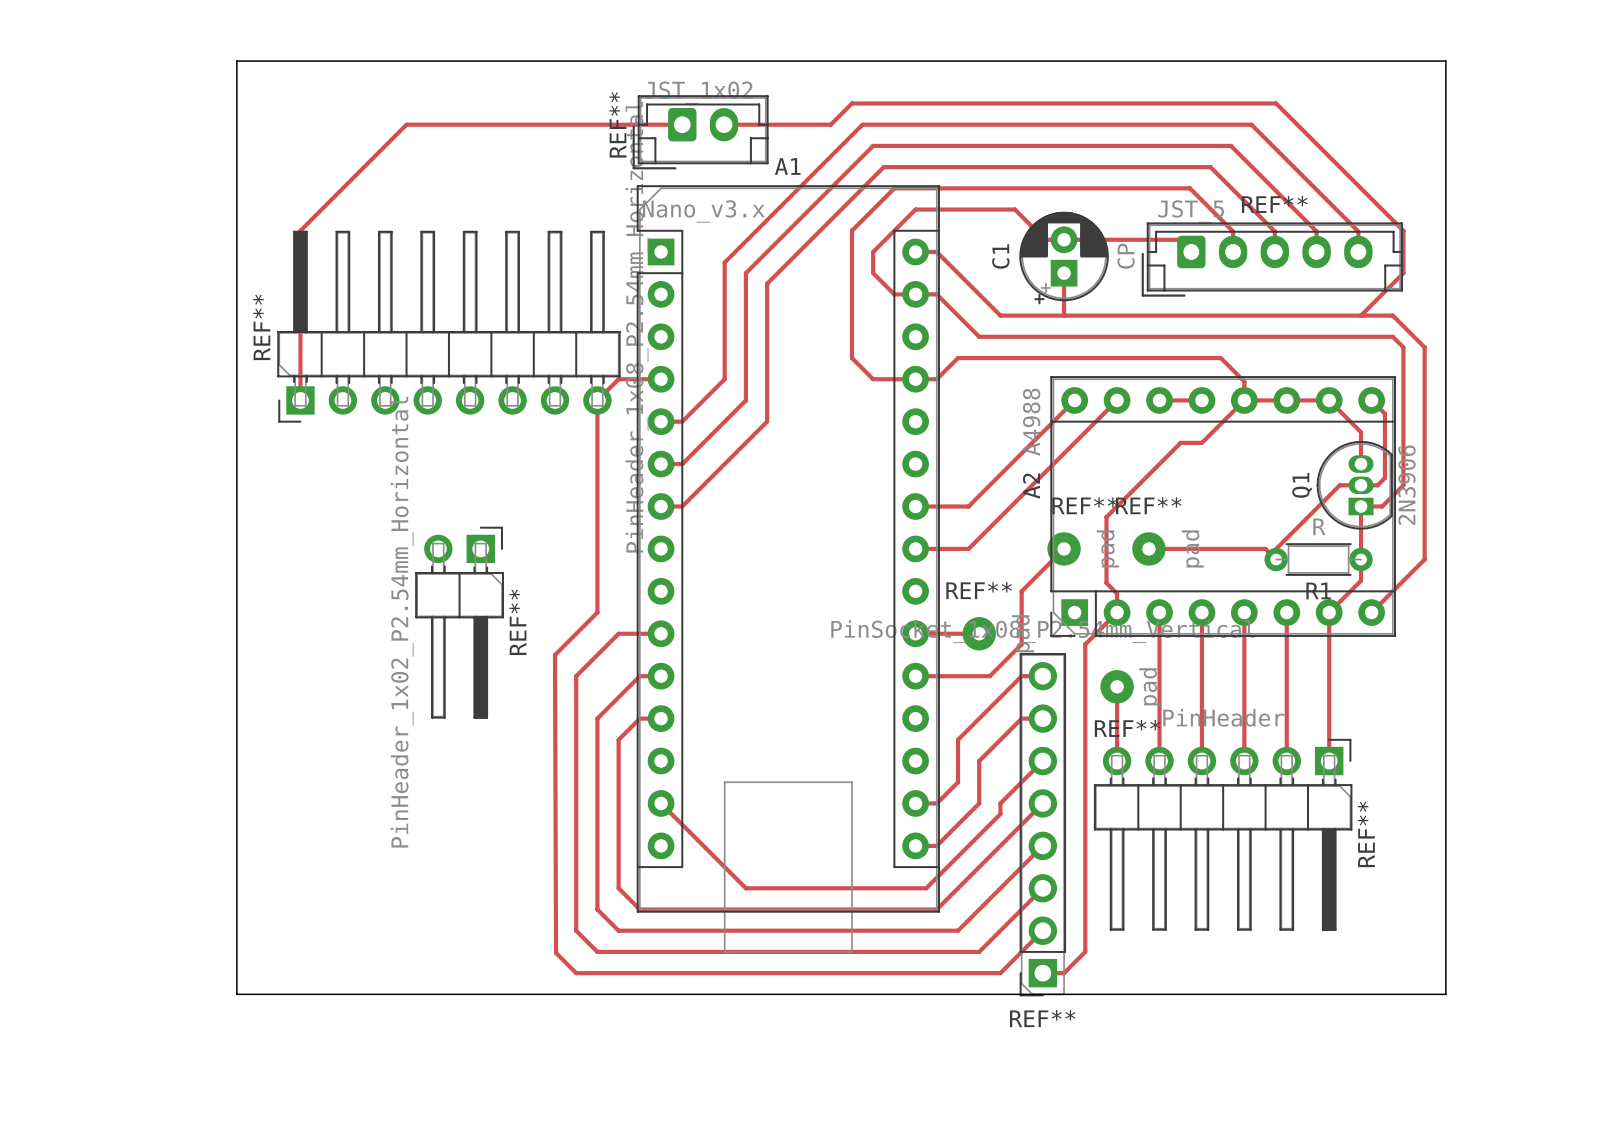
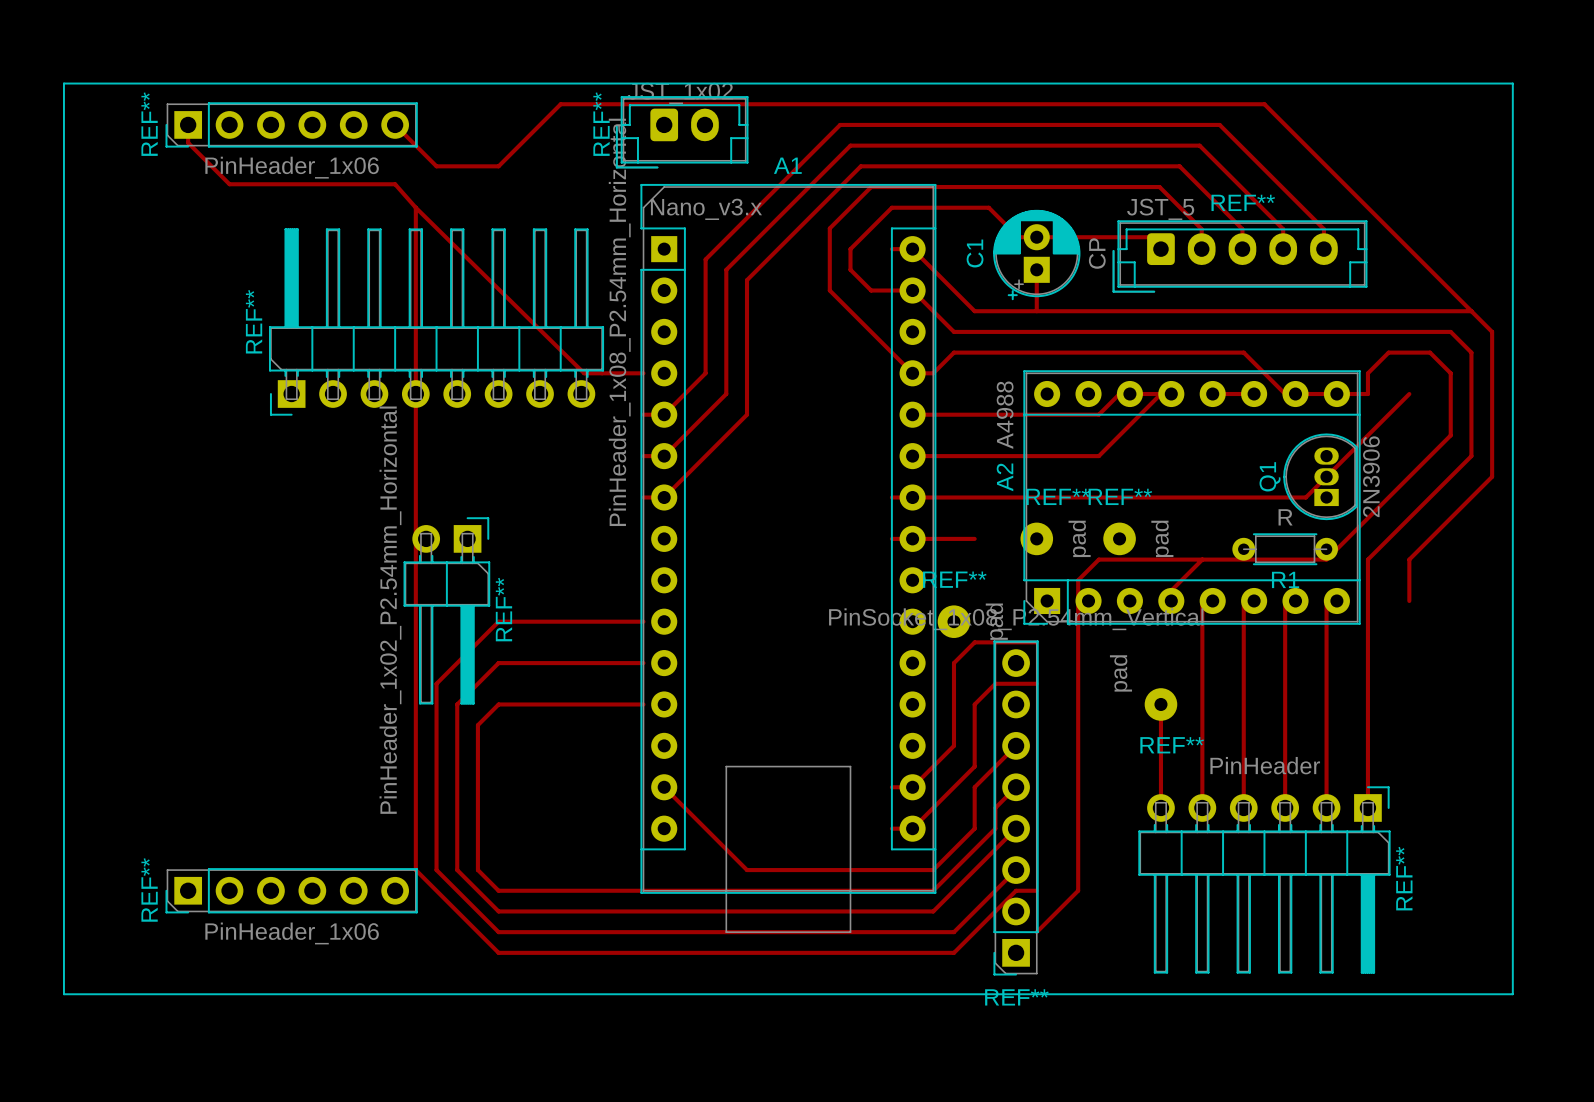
board edge: (236, 61) (236, 994) (1445, 994) (1445, 61) (236, 61) -> none
line: none -> (63, 83) (63, 994) (1512, 994) (1512, 83) (63, 83)
track: (851, 103) (830, 124) (724, 124) -> (829, 104) (560, 104) (498, 166) (436, 166) (395, 124)
track: (1276, 103) (1403, 230) (1403, 273) (1361, 315) -> (1243, 104) (1264, 104) (1492, 331) (1492, 476) (1409, 559) (1409, 600)
track: none -> (188, 124) (188, 142) (229, 184) (395, 184) (415, 207)
REF**: none -> PinHeader_1x06 (291, 124)
track: (682, 124) (406, 124) (300, 230) (300, 400) -> none
track: none -> (415, 207) (584, 373) (602, 373)
track: (851, 294) (851, 358) (873, 379) (911, 379) -> (829, 290) (912, 373) (933, 373) (953, 352)
track: (1392, 315) (1424, 347) (1424, 559) (1371, 612) -> (1357, 311) (1471, 311)
track: (1392, 336) (1403, 347) (1403, 379) -> (1357, 331) (1450, 331) (1471, 352) (1471, 456) (1367, 559) (1367, 807)
track: (979, 358) (958, 358) (936, 379) (915, 379) -> none
track: (1220, 358) (1244, 381) (1244, 400) (1201, 442) (1180, 442) (1106, 517) (1106, 583) (1117, 593) (1117, 612) (1085, 644) (1085, 951) (1064, 973) (1042, 973) -> none
track: (618, 379) (597, 400) (597, 612) (555, 654) (556, 952) (576, 973) -> (415, 207) (415, 870) (498, 952) (560, 952)
track: none -> (1367, 373) (1388, 352) (1430, 352) (1450, 373) (1450, 435) (1326, 559) (1098, 559) (1078, 580) (1078, 890) (1036, 932)
track: (1074, 400) (968, 506) -> (1409, 394) (1305, 497) (943, 497)
track: (1117, 400) (968, 548) -> (974, 538) (943, 538)
track: none -> (1119, 394) (1098, 414) (912, 414)
track: none -> (1160, 394) (1098, 456) (912, 456)
track: (1286, 400) (1318, 400) -> (1189, 352) (1243, 352) (1285, 394)
track: (1329, 400) (1361, 432) (1361, 464) -> (1295, 394) (1367, 394)
track: (1371, 400) (1384, 413) (1384, 478) (1377, 485) (1339, 485) (1276, 548) (1276, 559) (1265, 548) (1148, 548) -> none
track: (1403, 400) (1403, 485) (1382, 506) (1361, 506) (1361, 580) (1329, 612) (1329, 761) -> none
track: (1064, 548) (1021, 591) (1021, 644) (989, 676) (915, 676) -> none
A1 position: (788, 568) -> (788, 558)
track: none -> (1202, 559) (1160, 600)
track: (1159, 612) (1159, 761) -> none
track: (1201, 612) (1201, 761) -> none
track: none -> (1202, 600) (1202, 807)
track: (1244, 612) (1244, 761) -> none
track: none -> (1243, 600) (1243, 807)
track: (1286, 612) (1286, 761) -> none
track: none -> (1285, 600) (1285, 807)
track: none -> (1326, 600) (1326, 807)
track: (618, 633) (576, 676) (576, 930) (597, 951) -> (602, 621) (498, 621) (436, 683) (436, 870) (498, 932) (581, 932)
track: (915, 633) (979, 633) -> none
track: (639, 676) (597, 718) (597, 909) (618, 930) -> (622, 663) (498, 663) (457, 704) (457, 870) (498, 911) (602, 911)
track: (1042, 676) (1021, 676) (958, 739) (958, 782) -> (1036, 642) (974, 642) (953, 663) (953, 745) (933, 766)
track: (1117, 686) (1117, 761) -> none
REF** position: (1117, 686) -> (1160, 704)
track: (639, 718) (618, 739) (618, 888) (639, 909) -> (622, 704) (498, 704) (477, 725) (477, 870) (498, 890) (622, 890)
track: (1042, 718) (1021, 718) (979, 761) (979, 803) -> (1036, 683) (995, 683) (974, 704) (974, 766) (953, 787)
track: none -> (1160, 704) (1160, 807)
track: (661, 803) (745, 888) (767, 888) -> (664, 787) (747, 870)
track: (1000, 814) (926, 888) -> none
track: (1021, 824) (1000, 845) -> (974, 797) (974, 828)
track: none -> (995, 807) (995, 828) (933, 890) (912, 890)
REF** position: (1223, 834) -> (1264, 879)
track: (958, 888) (936, 909) -> (933, 870) (902, 870)
REF**: none -> PinHeader_1x06 (291, 890)
track: (1042, 930) (1000, 973) (979, 973) -> (1036, 890) (1016, 890) (953, 952)

